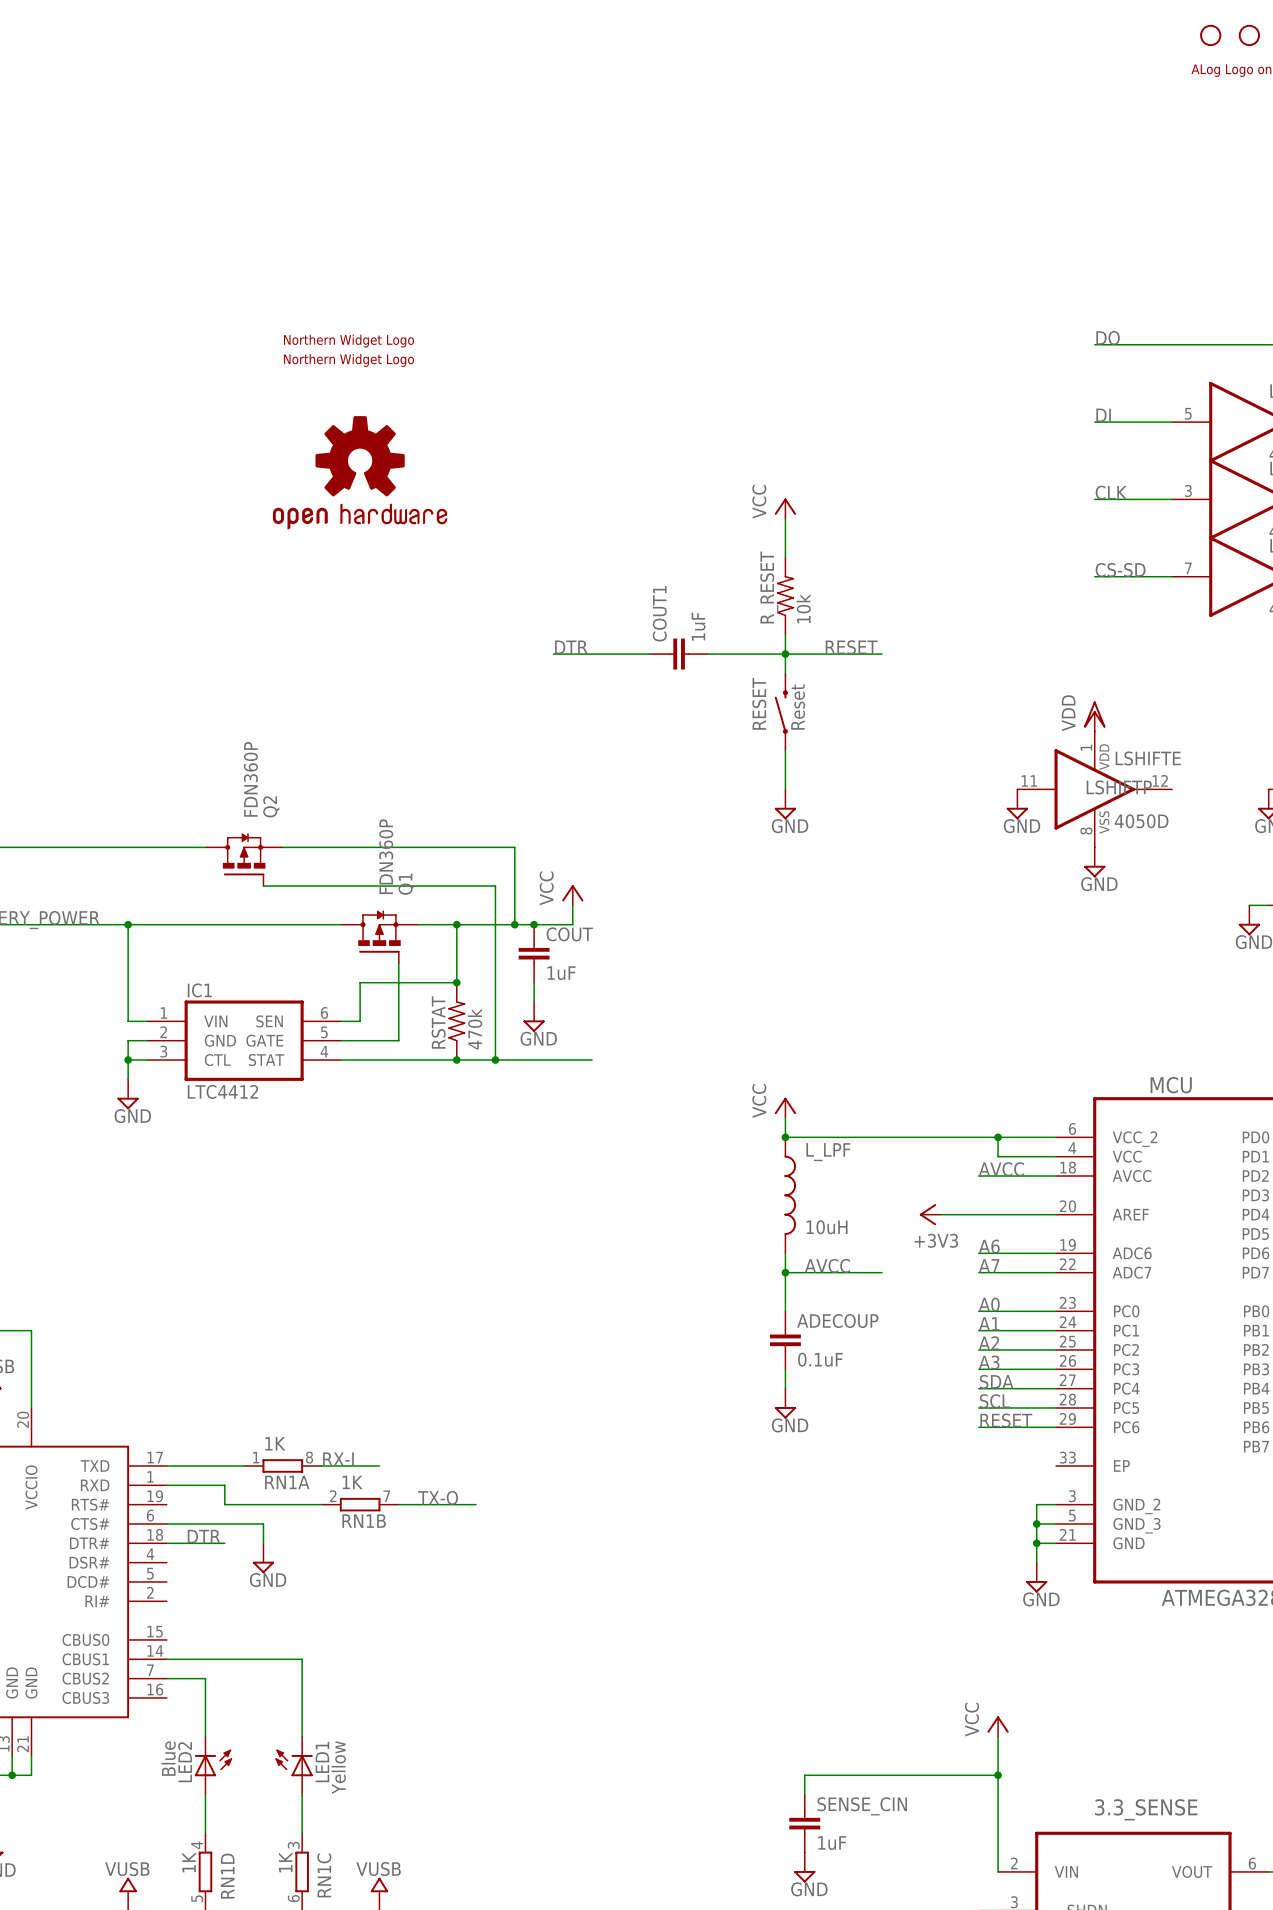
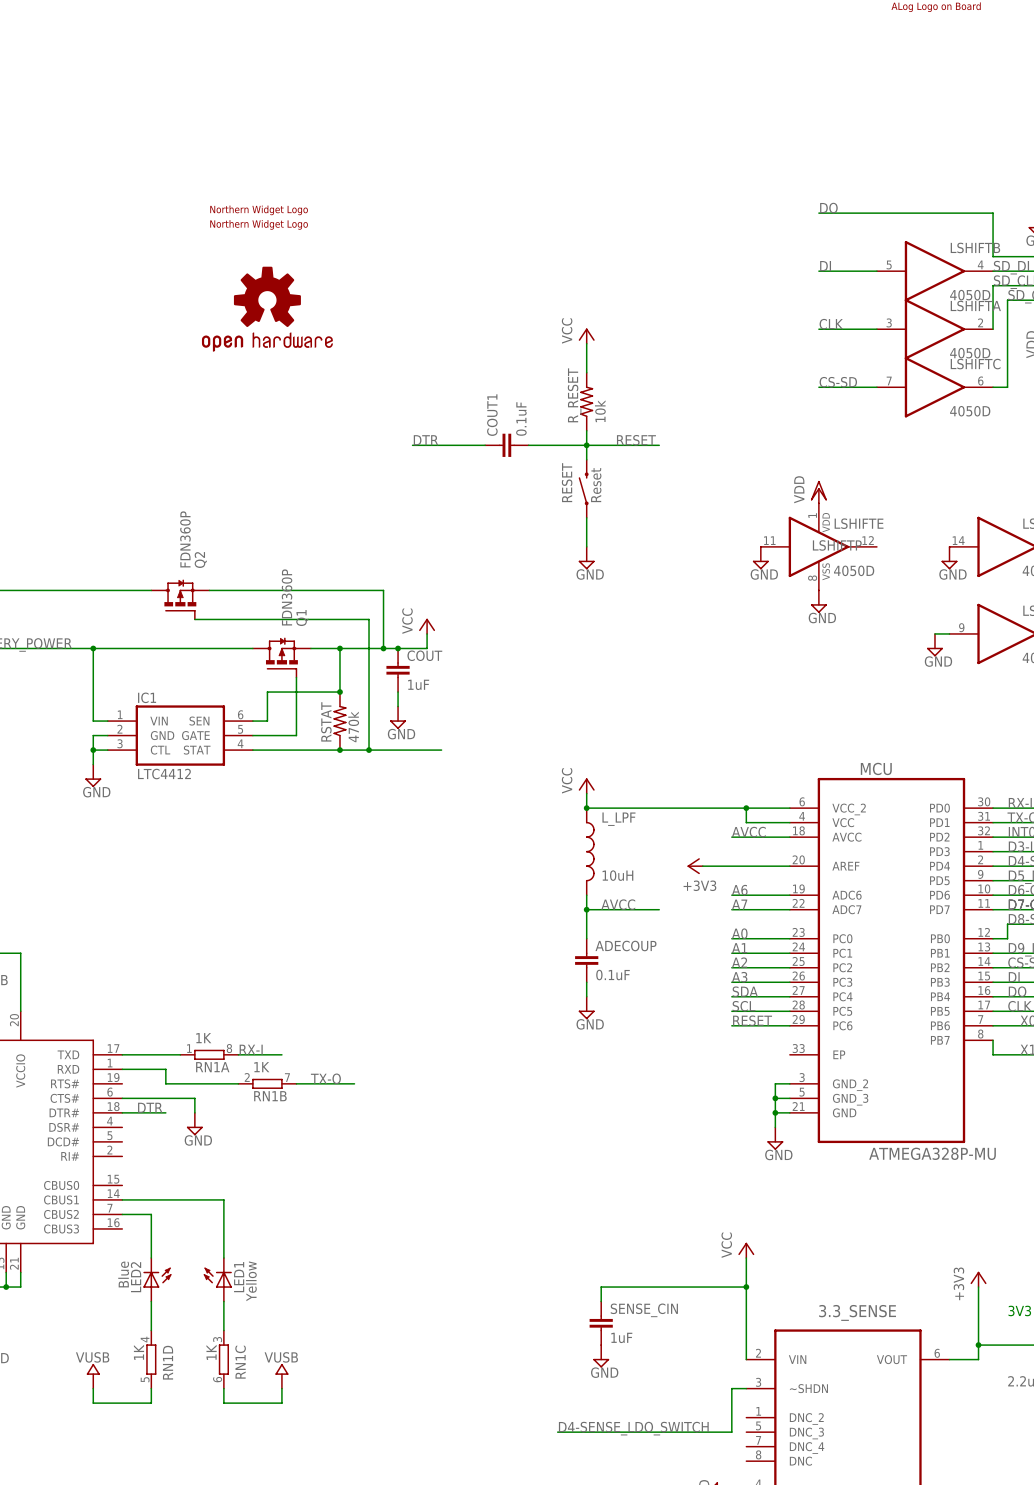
COUT1 value: 1uF (698, 626) -> 0.1uF (521, 419)

